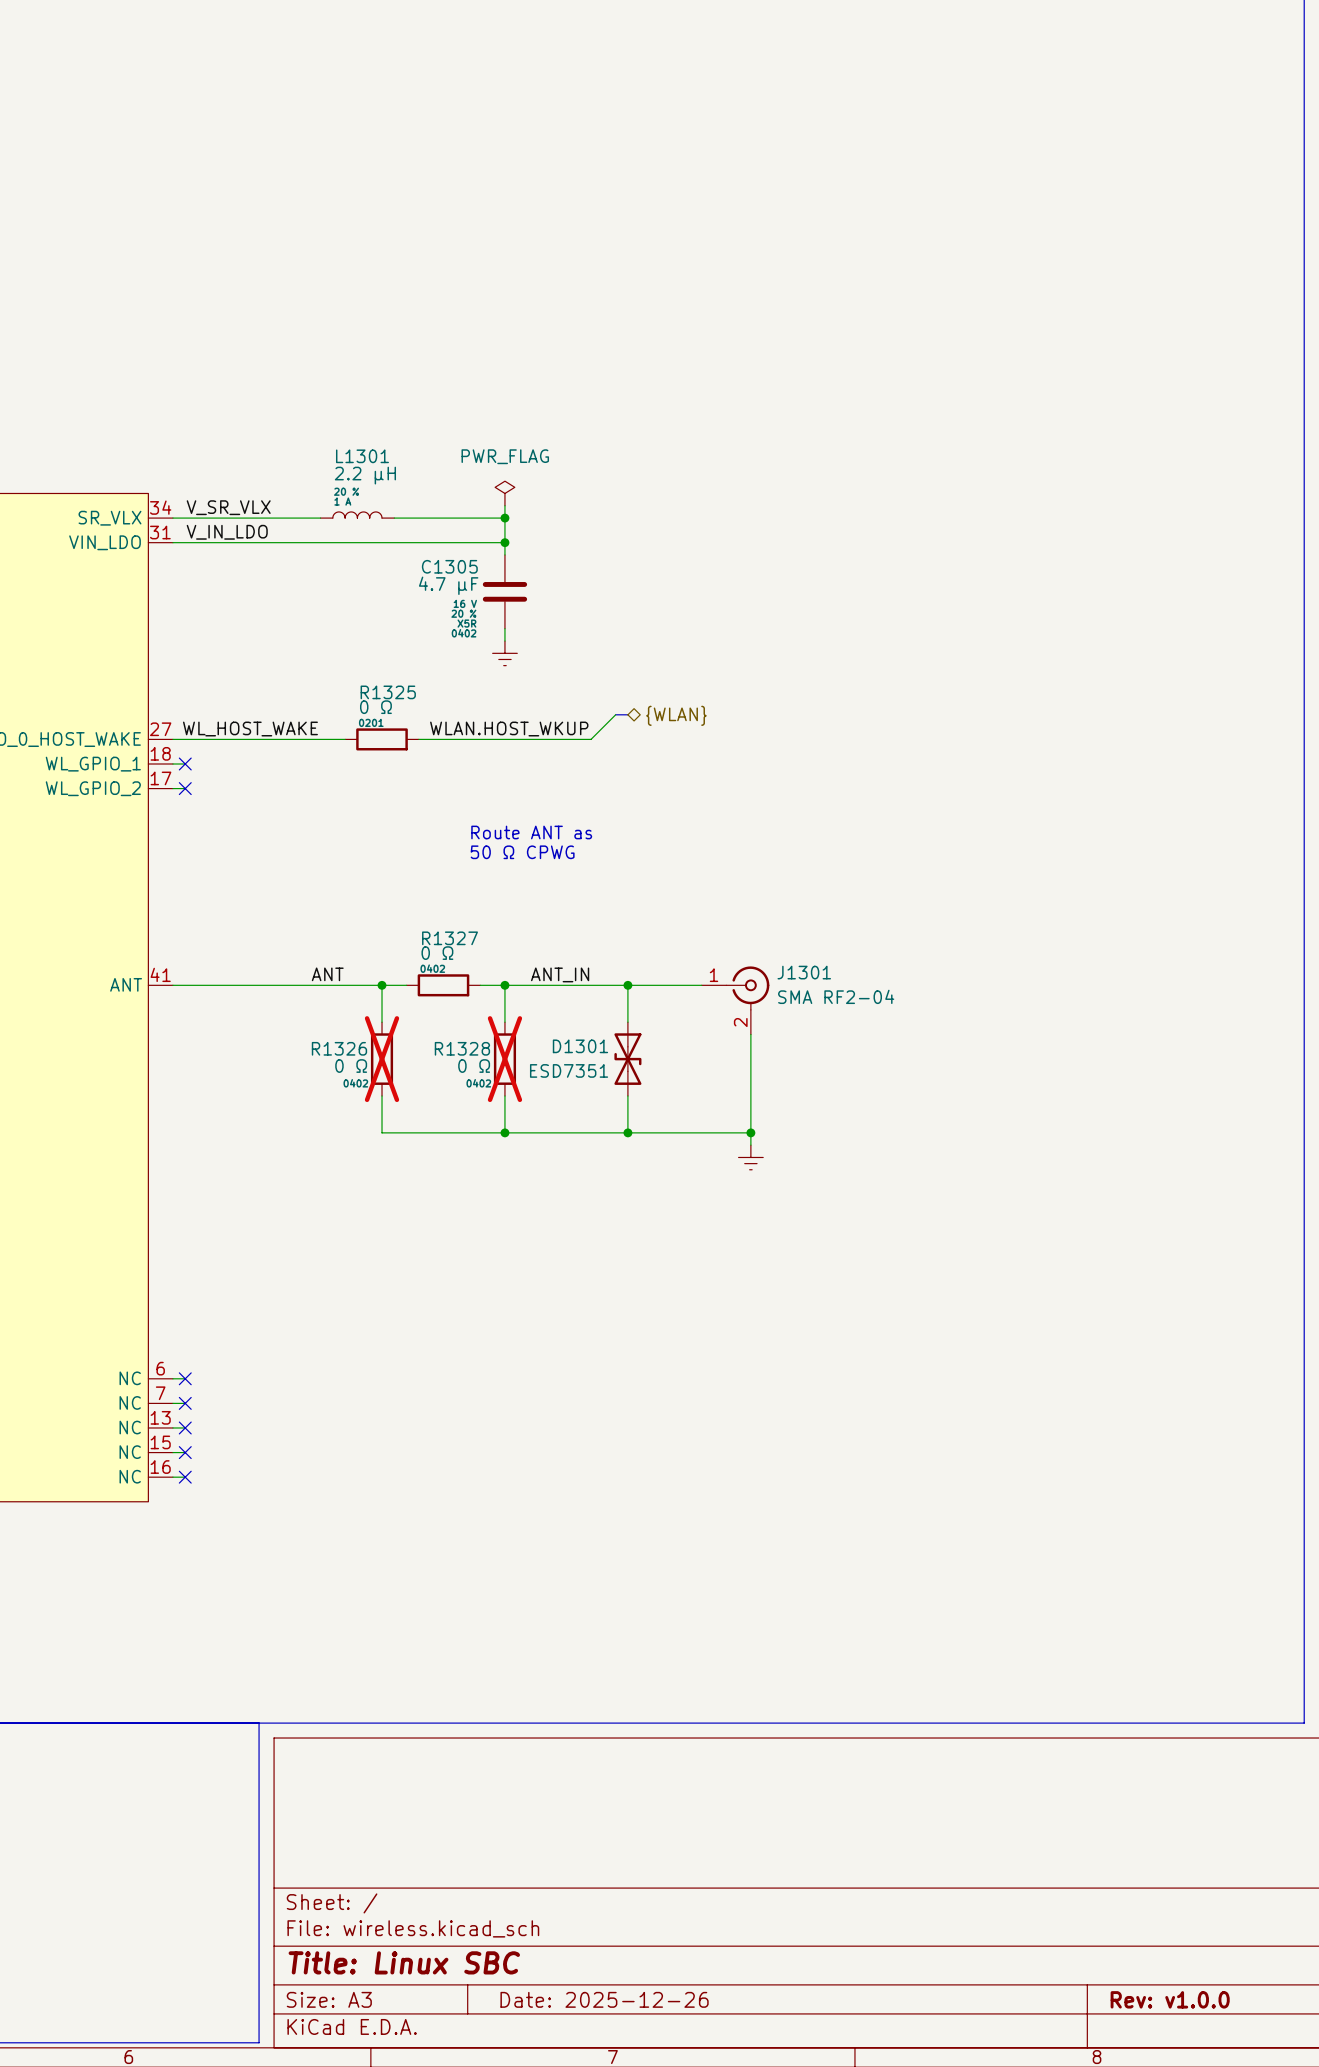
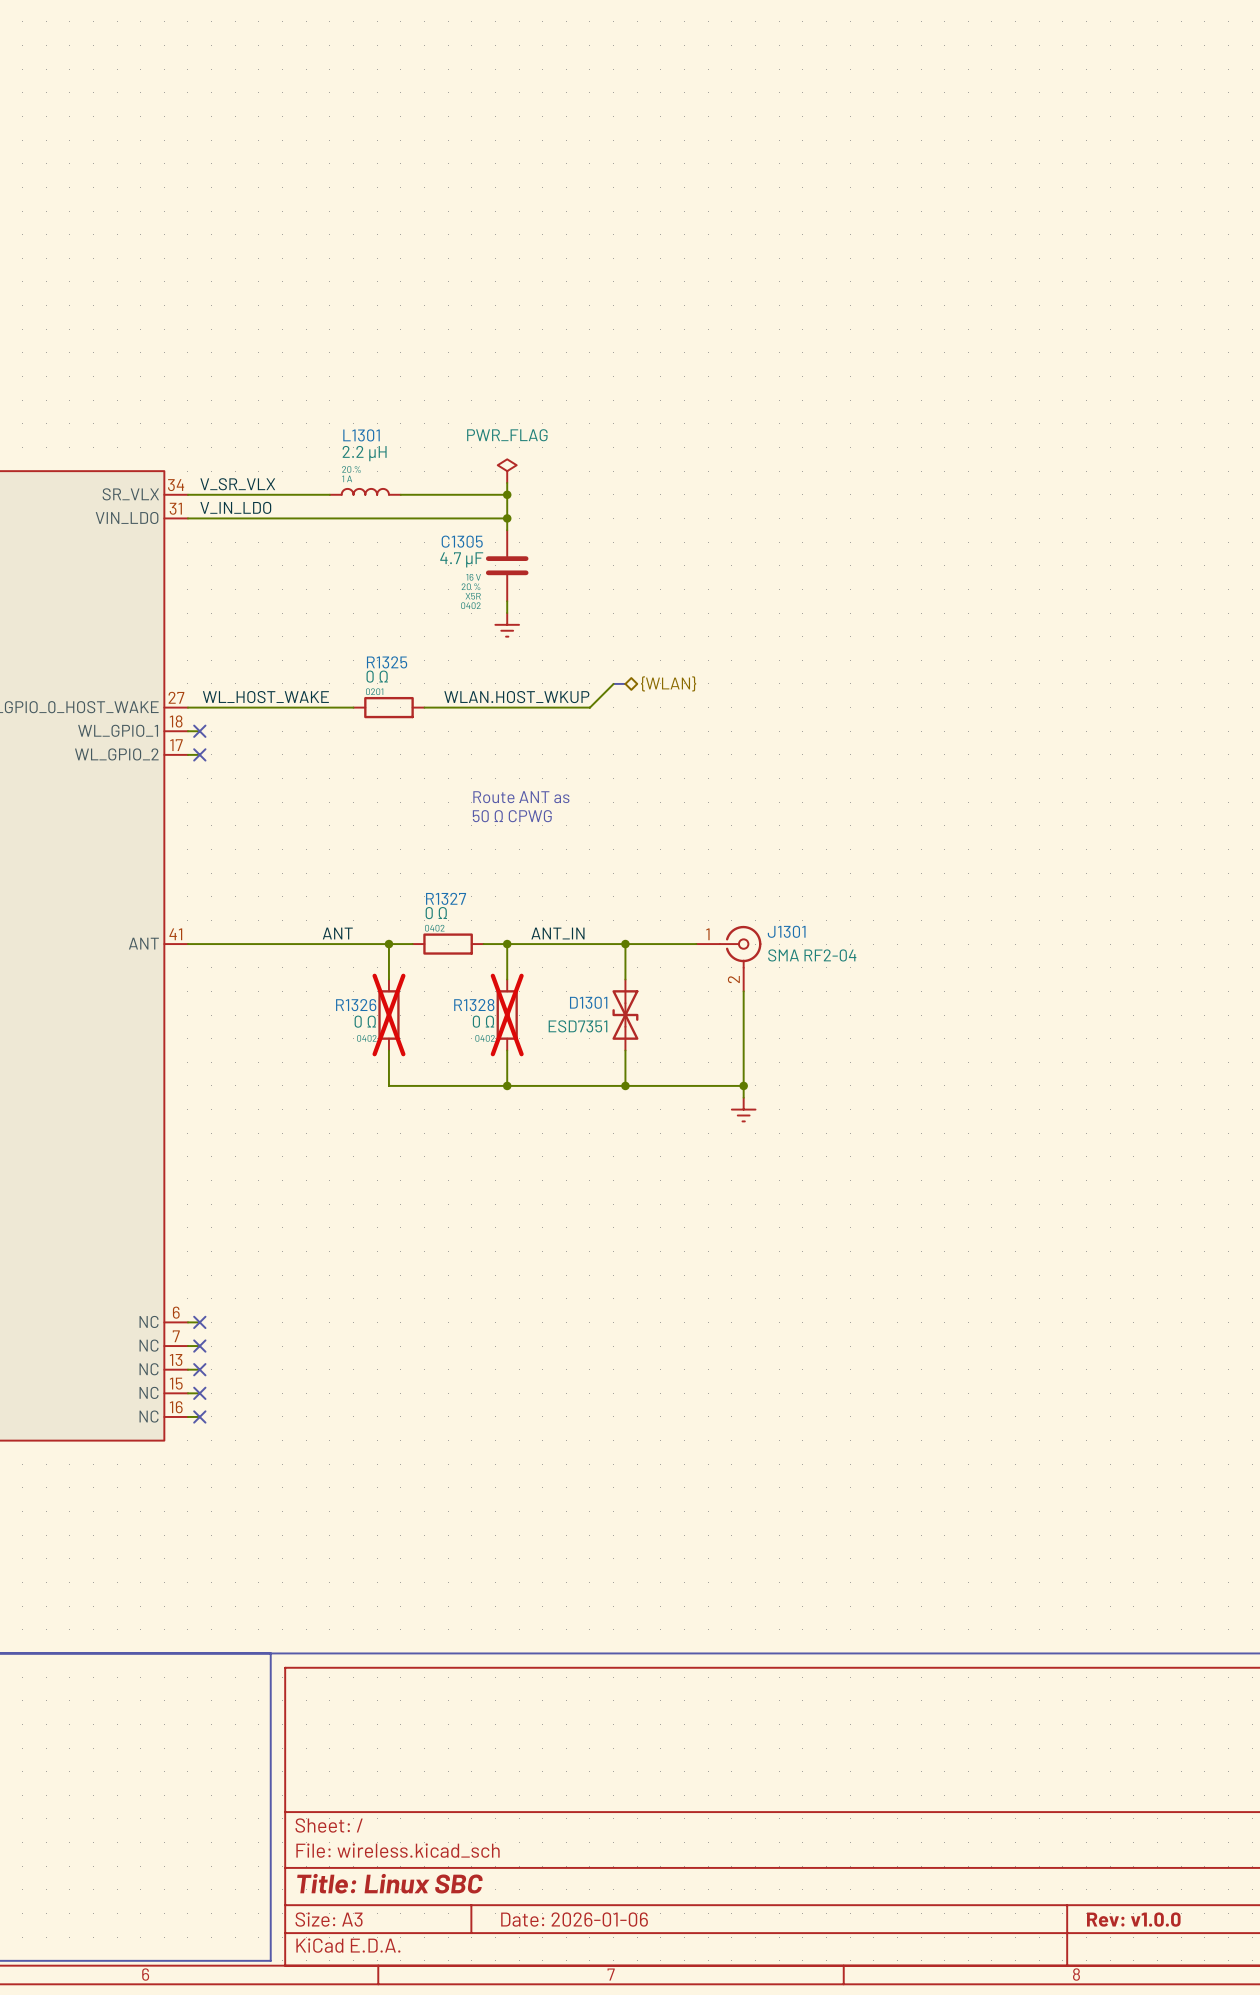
title block: Date: 2025-12-26 (604, 1999) -> Date: 2026-01-06 (574, 1919)

